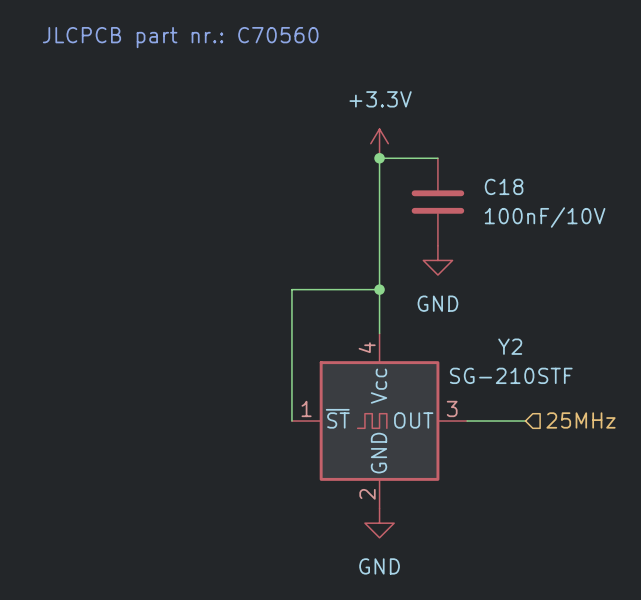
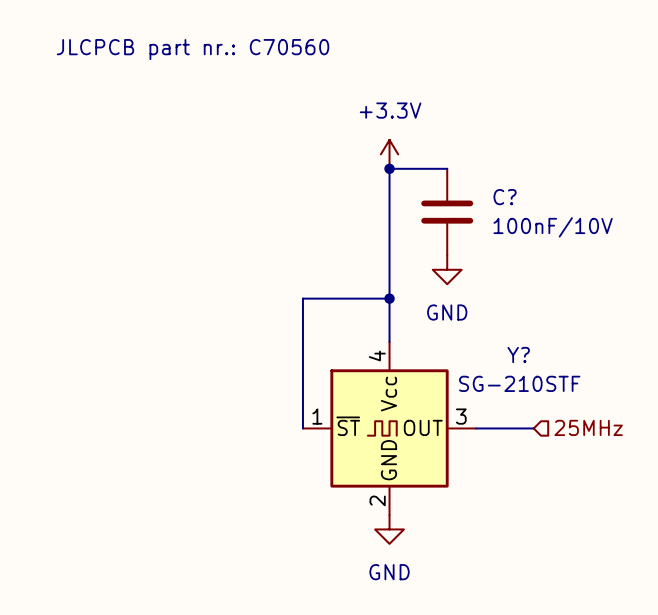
C18 name: C18 (504, 186) -> C? (505, 197)
Y2 name: Y2 (510, 346) -> Y? (518, 355)

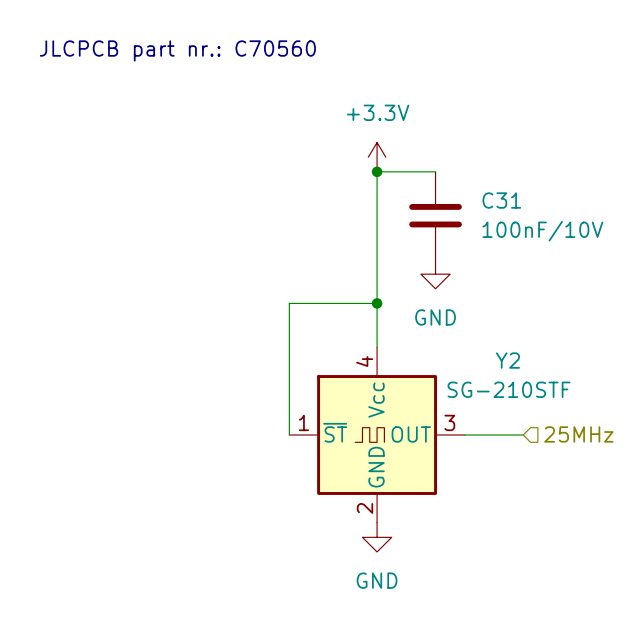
C? name: C? (505, 197) -> C31 (501, 200)
Y? name: Y? (518, 355) -> Y2 (507, 360)

